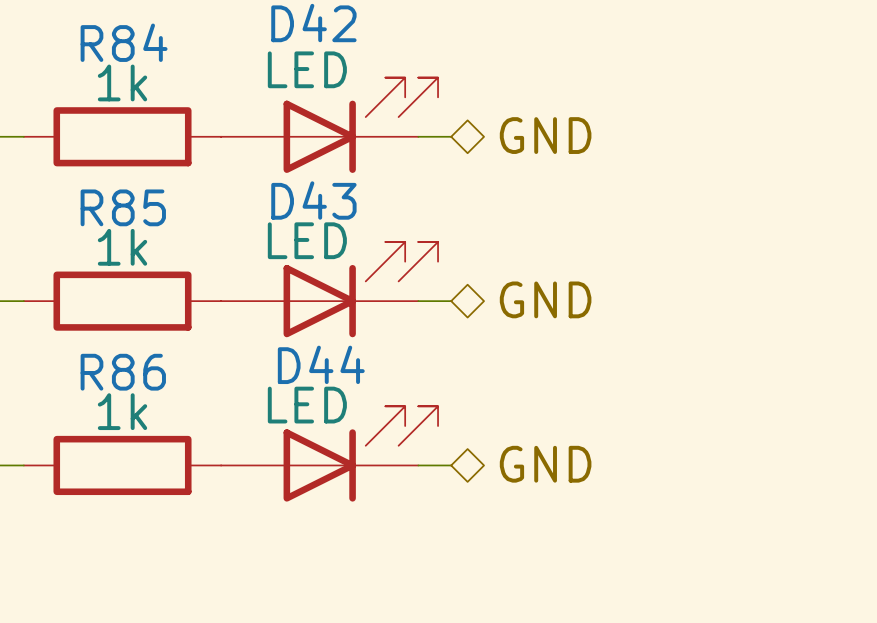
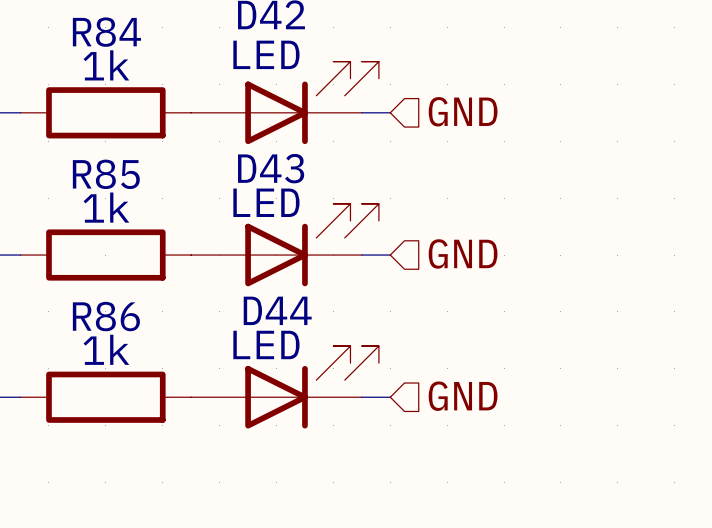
hierarchical label shape: bidirectional (545, 135) -> input (463, 111)
hierarchical label shape: bidirectional (545, 299) -> input (463, 253)
hierarchical label shape: bidirectional (545, 464) -> input (463, 396)

